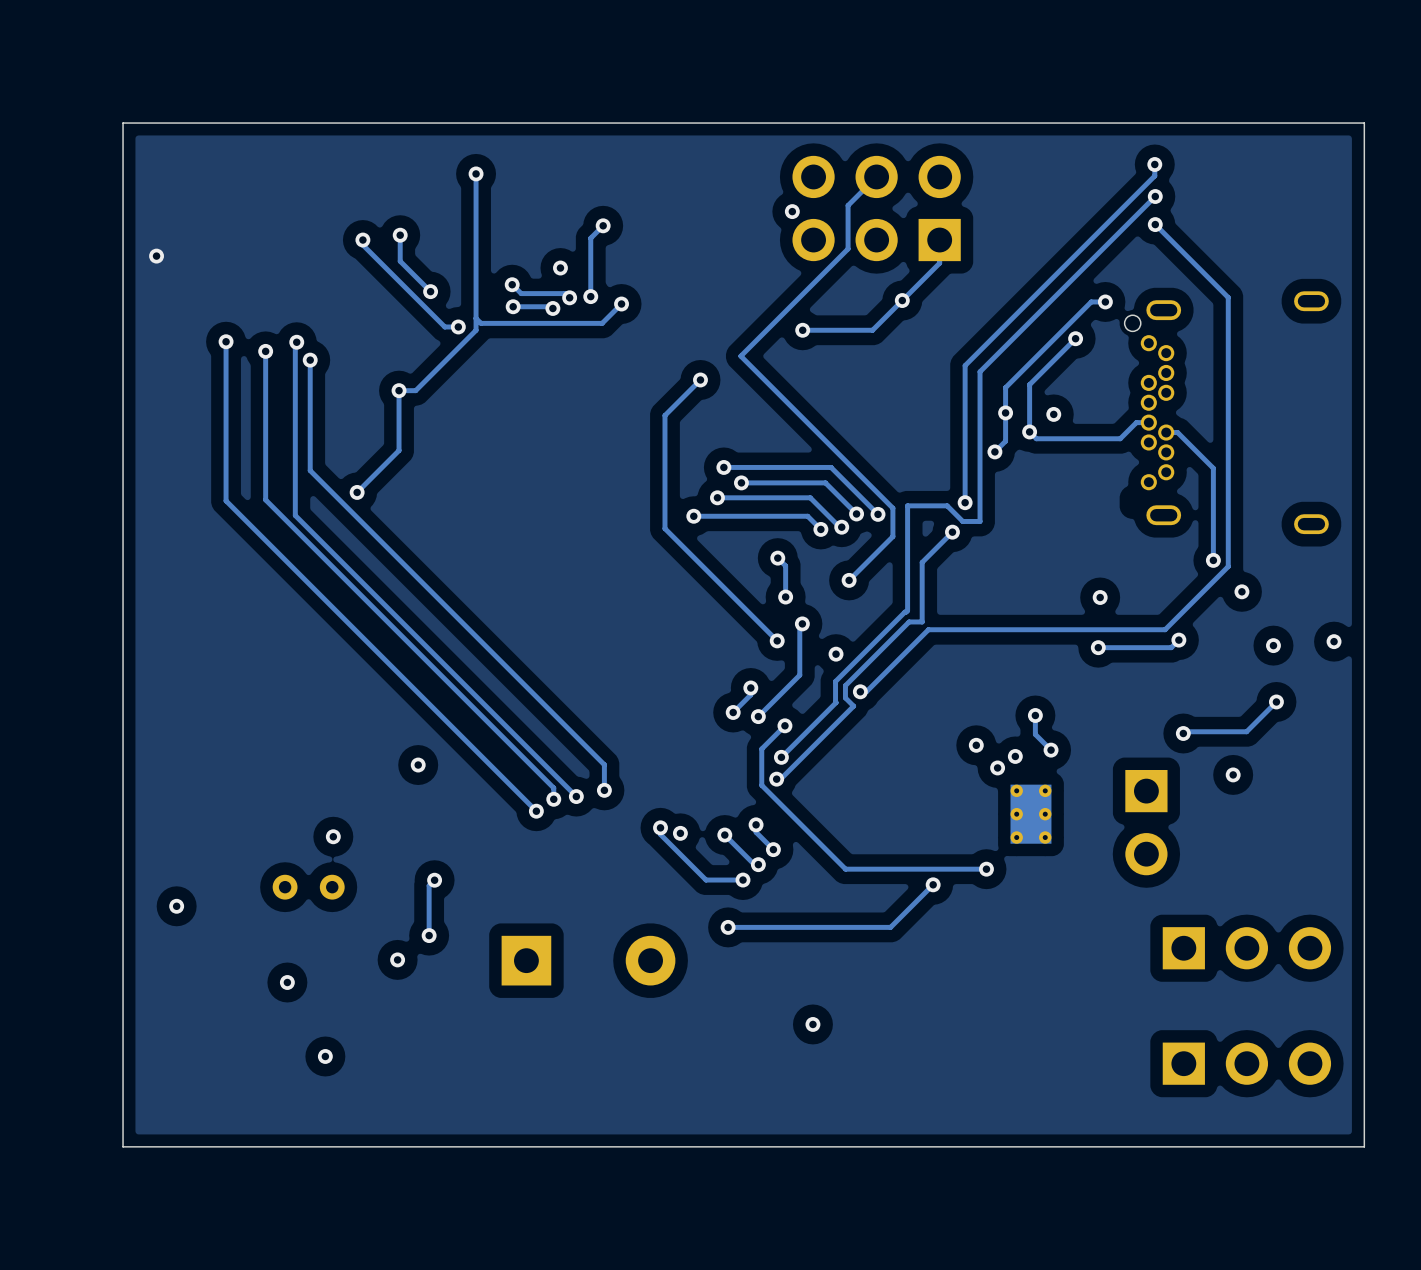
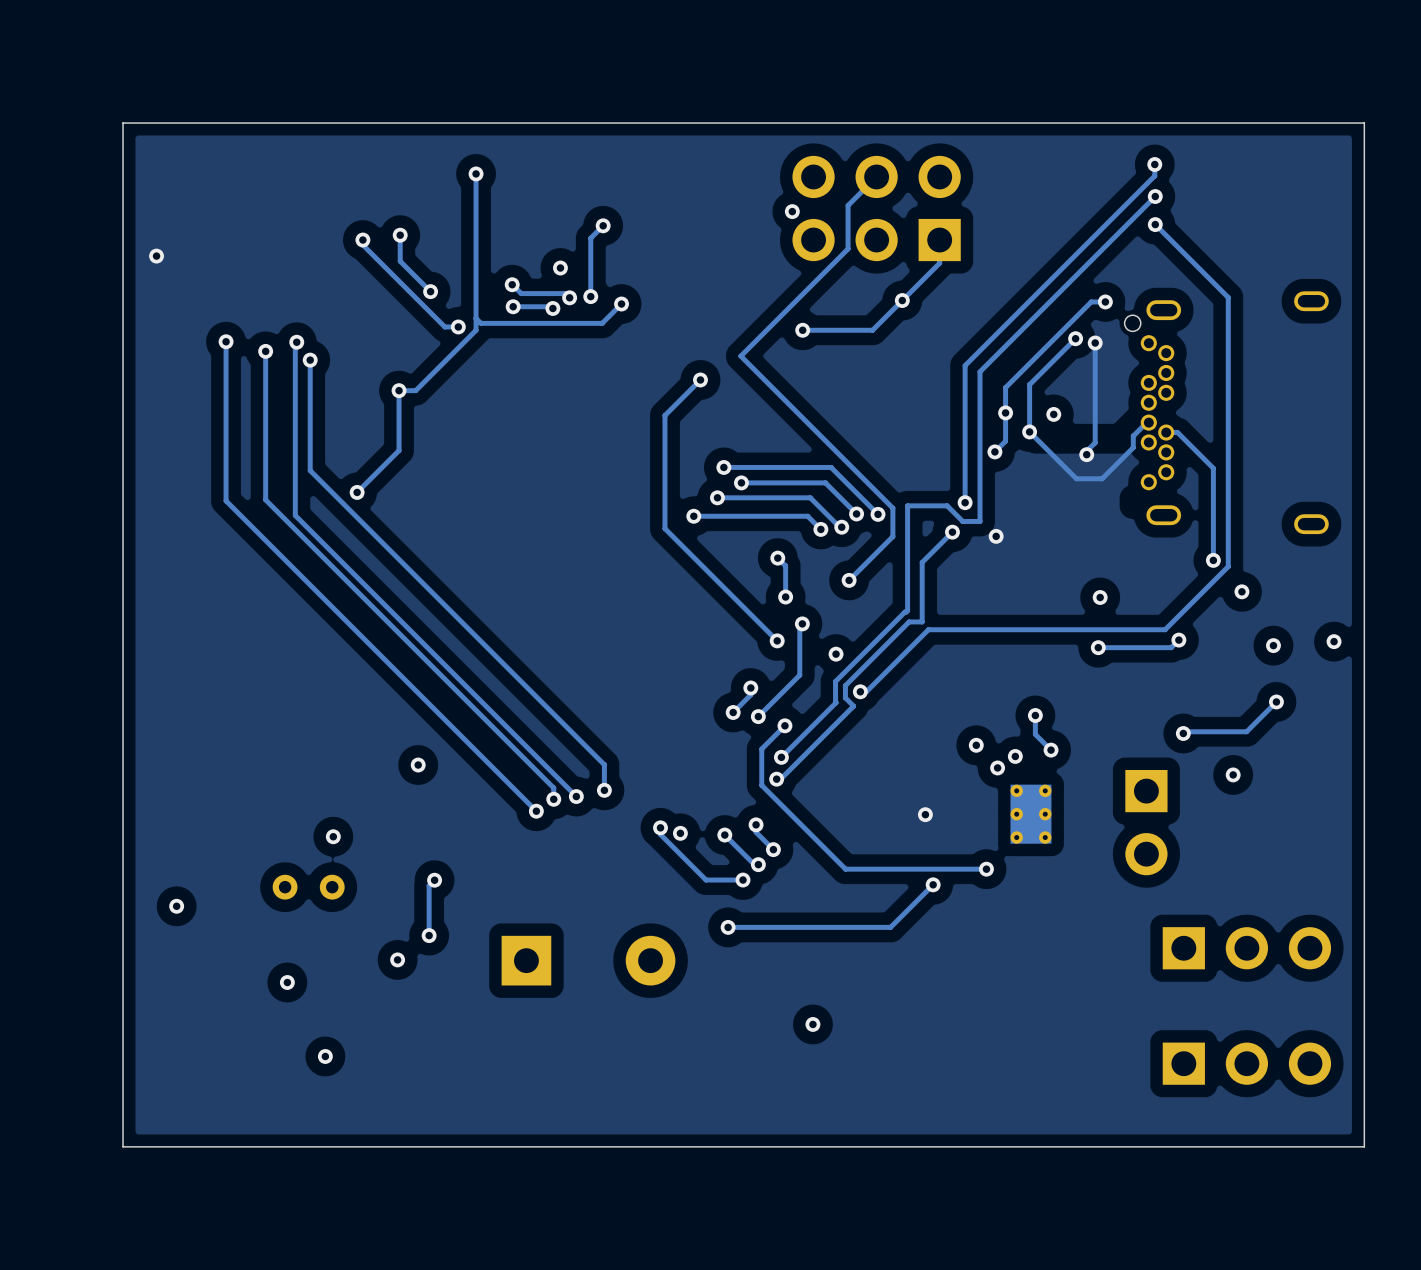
track: none -> (1095, 342) (1095, 442) (1086, 451) (1086, 454)
via: none -> (1095, 342)
track: (1146, 422) (1136, 422) (1120, 438) (1036, 438) -> (1146, 422) (1133, 436) (1133, 447) (1102, 478) (1076, 478) (1036, 438)
via: none -> (1086, 454)
via: none -> (996, 536)
via: none -> (925, 814)

